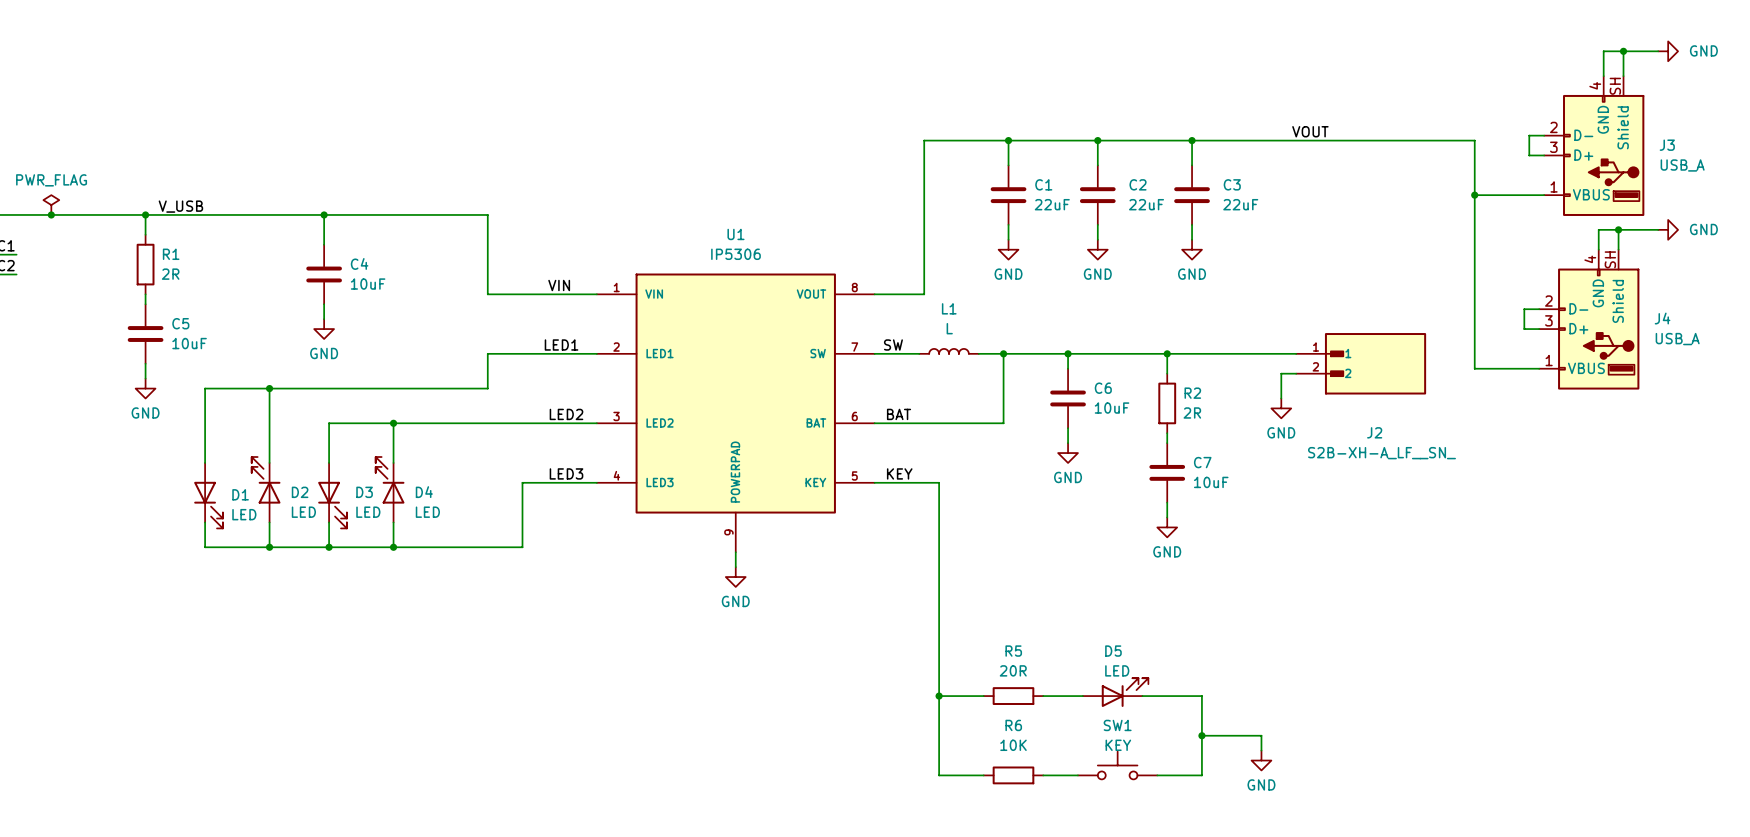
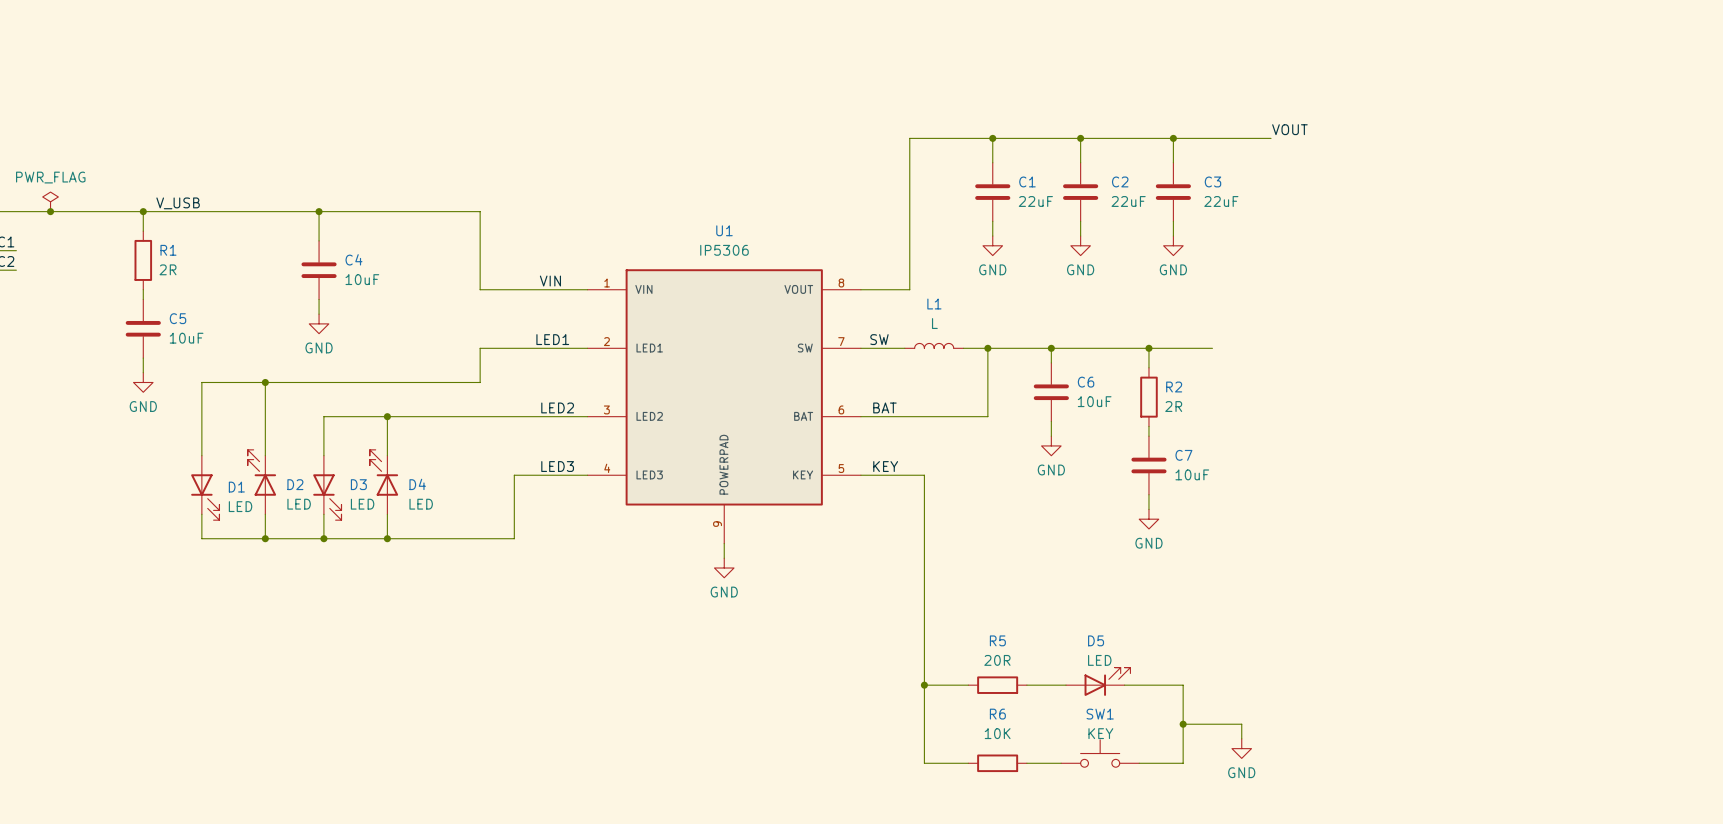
wire: (1623, 51) (1623, 76) -> none
junction: (1623, 51) -> none
wire: (1658, 51) (1603, 51) (1603, 76) -> none
power symbol: GND (1668, 51) -> none
wire: (1544, 135) (1529, 135) (1529, 155) (1544, 155) -> none
wire: (1291, 140) (1474, 140) (1474, 368) (1539, 368) -> none
J3: USB_A (1594, 146) -> none
wire: (1474, 195) (1544, 195) -> none
junction: (1474, 195) -> none
wire: (1618, 229) (1618, 249) -> none
junction: (1618, 229) -> none
wire: (1658, 229) (1598, 229) (1598, 249) -> none
power symbol: GND (1668, 229) -> none
wire: (1539, 309) (1524, 309) (1524, 329) (1539, 329) -> none
J4: USB_A (1589, 319) -> none
wire: (1231, 353) (1296, 353) -> none
J2: S2B-XH-A_LF__SN_ (1361, 363) -> none
wire: (1296, 373) (1281, 373) (1281, 398) -> none
power symbol: GND (1281, 408) -> none

